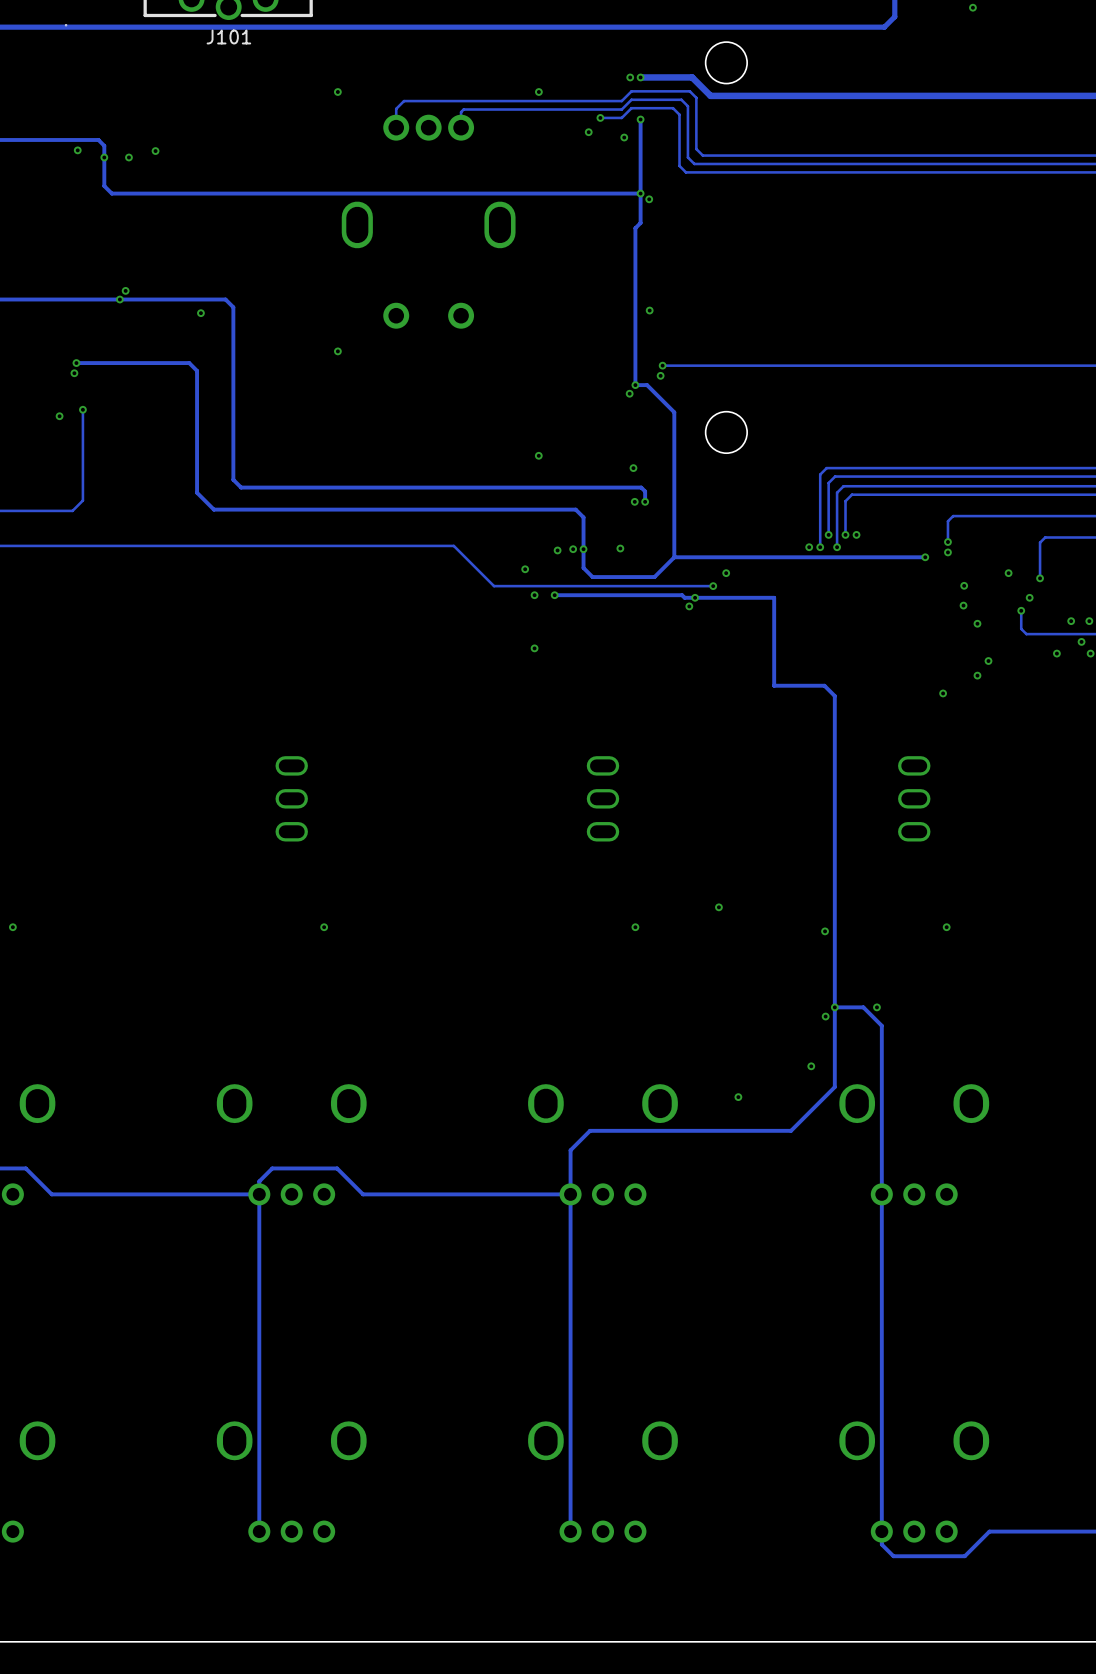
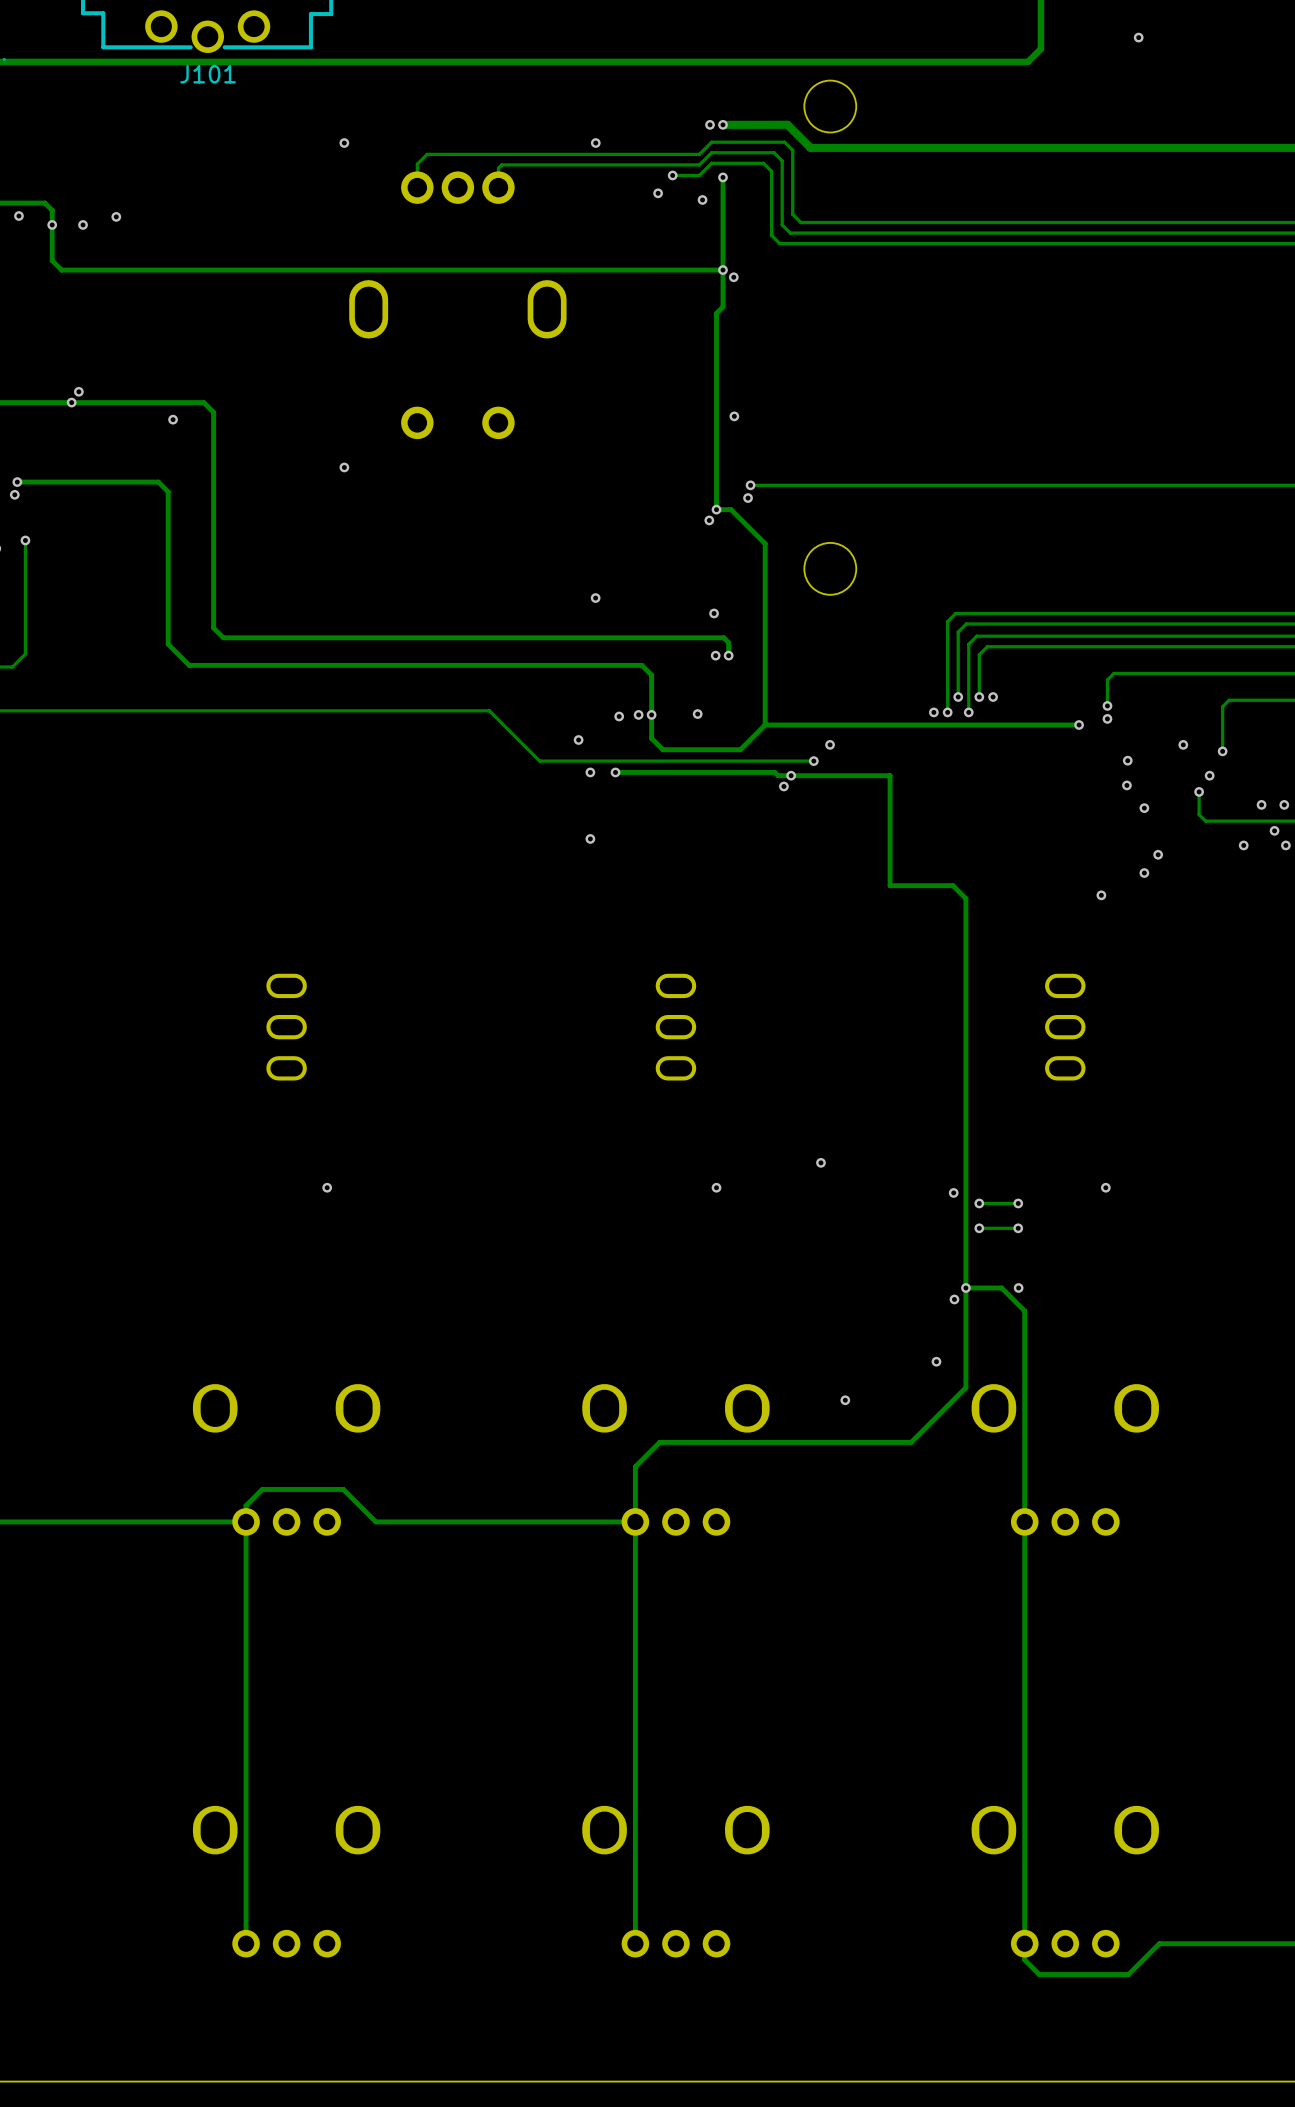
via: none -> (979, 1203)
track: none -> (1018, 1203) (979, 1203)
via: none -> (1018, 1203)
via: none -> (979, 1228)
track: none -> (1018, 1228) (979, 1228)
via: none -> (1018, 1228)

